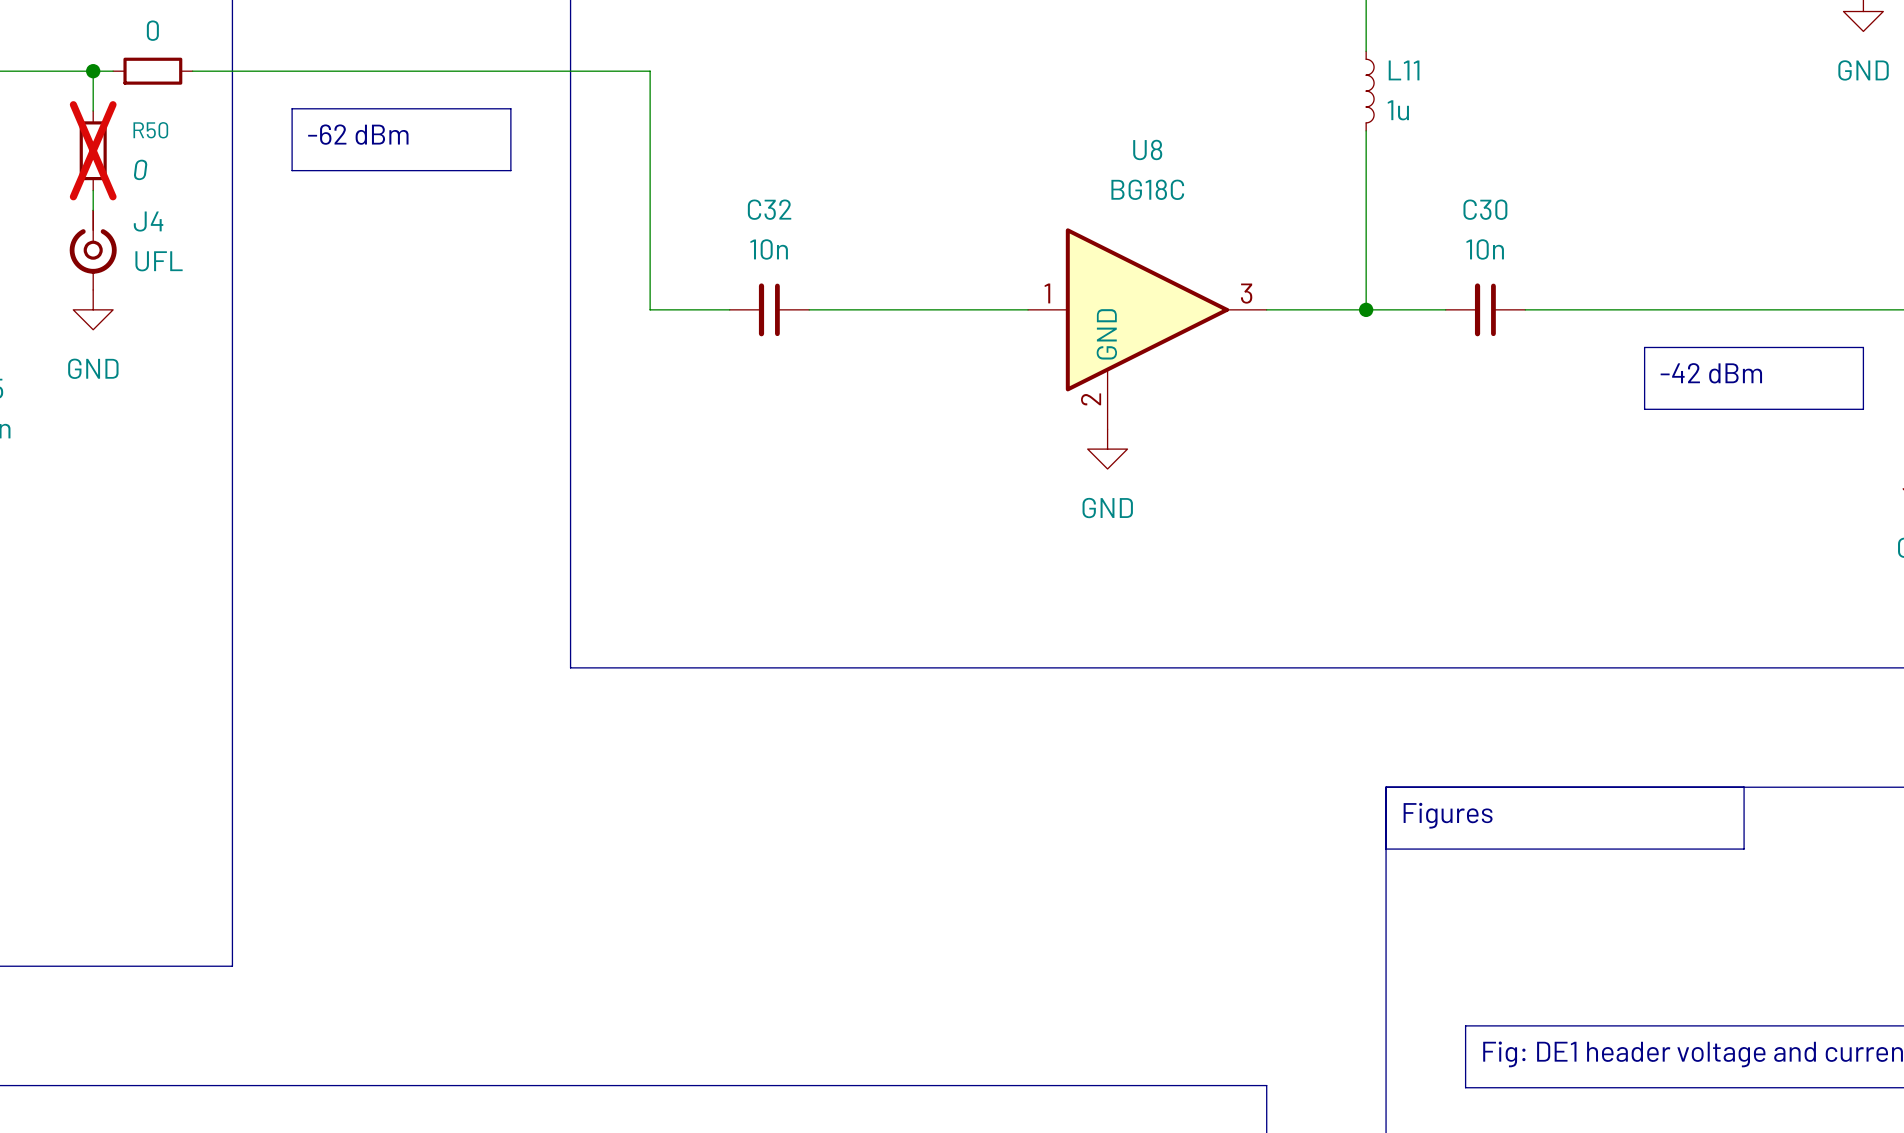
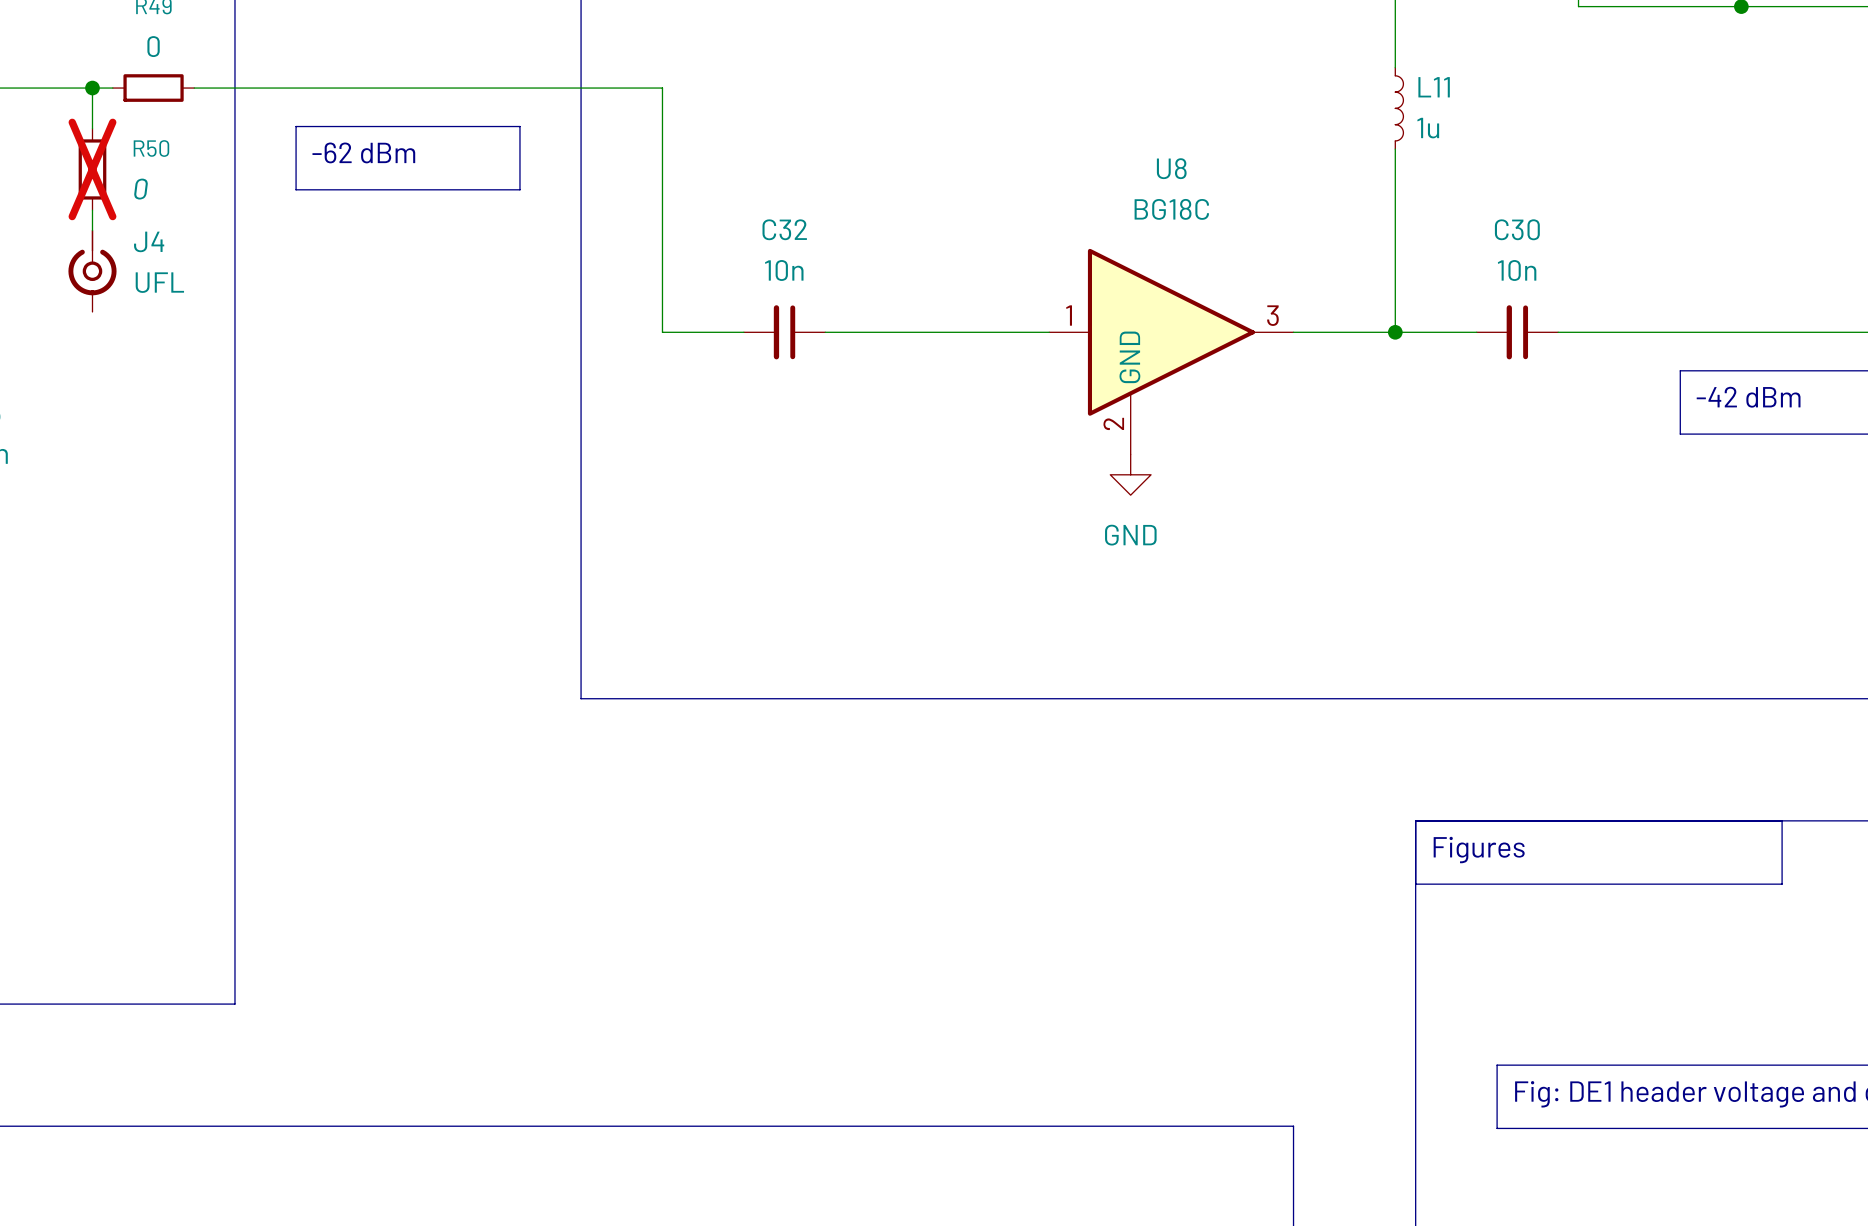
power symbol: GND (93, 309) -> none

